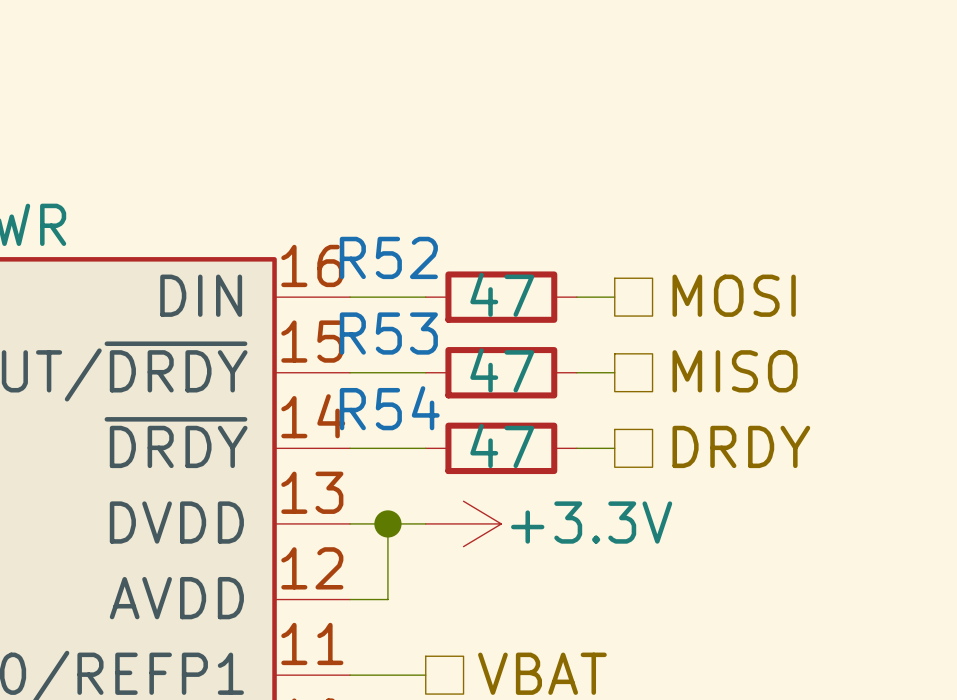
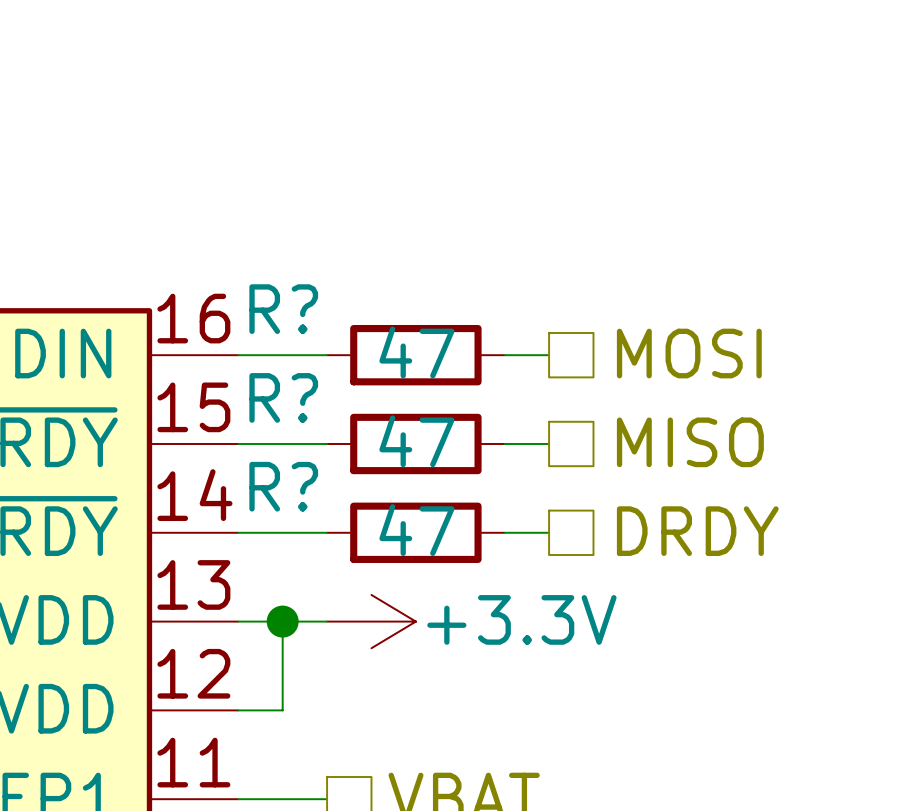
R52 name: R52 (388, 257) -> R? (283, 309)
R53 name: R53 (388, 333) -> R? (283, 397)
R54 name: R54 (389, 408) -> R? (283, 486)

